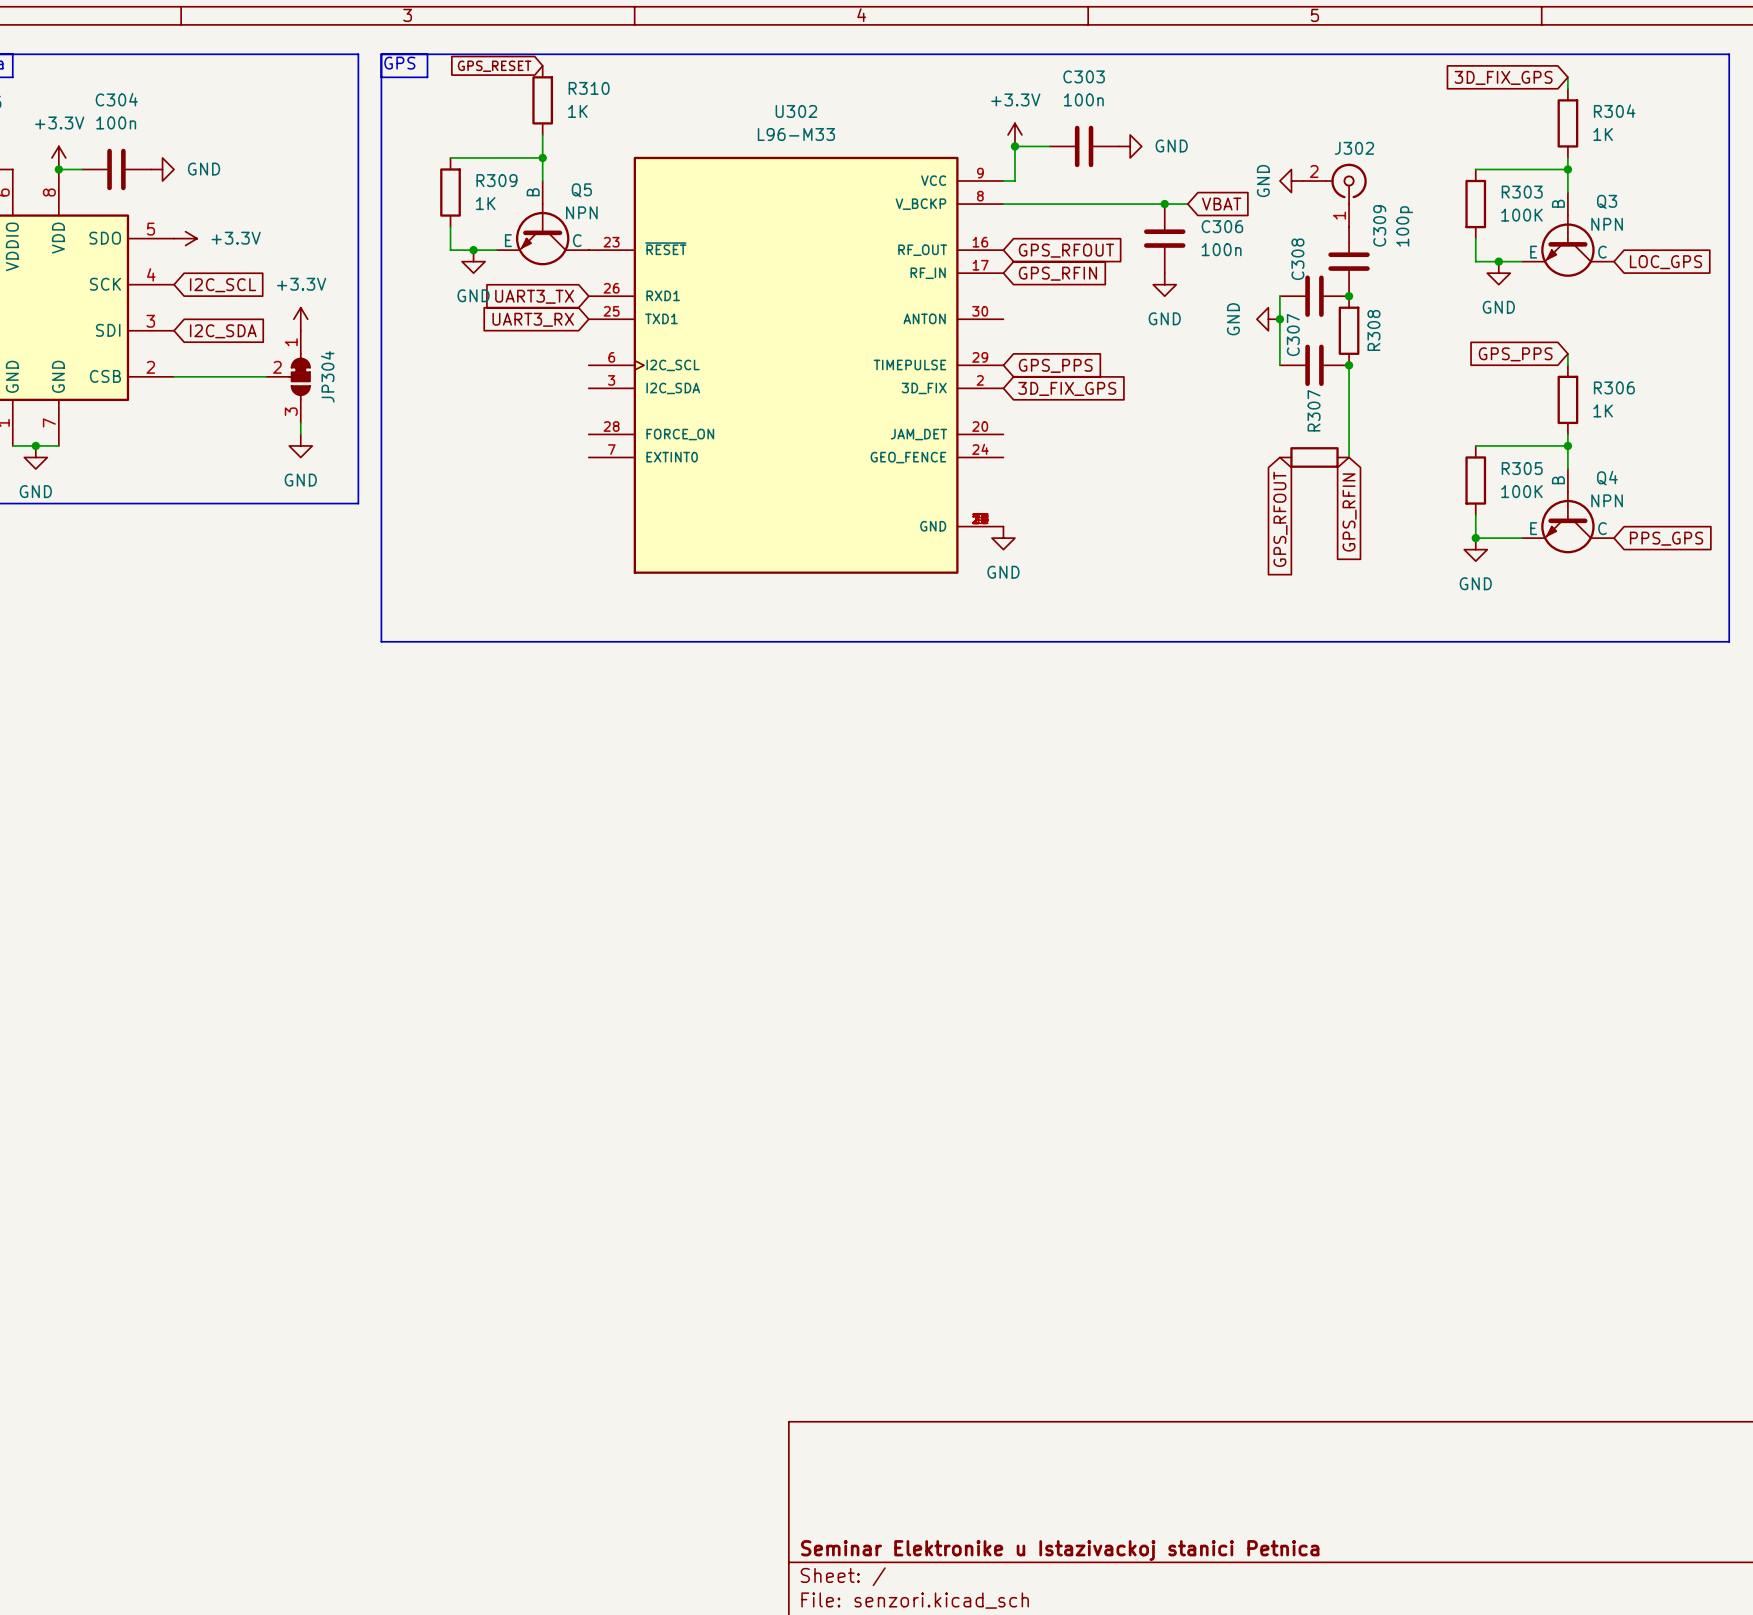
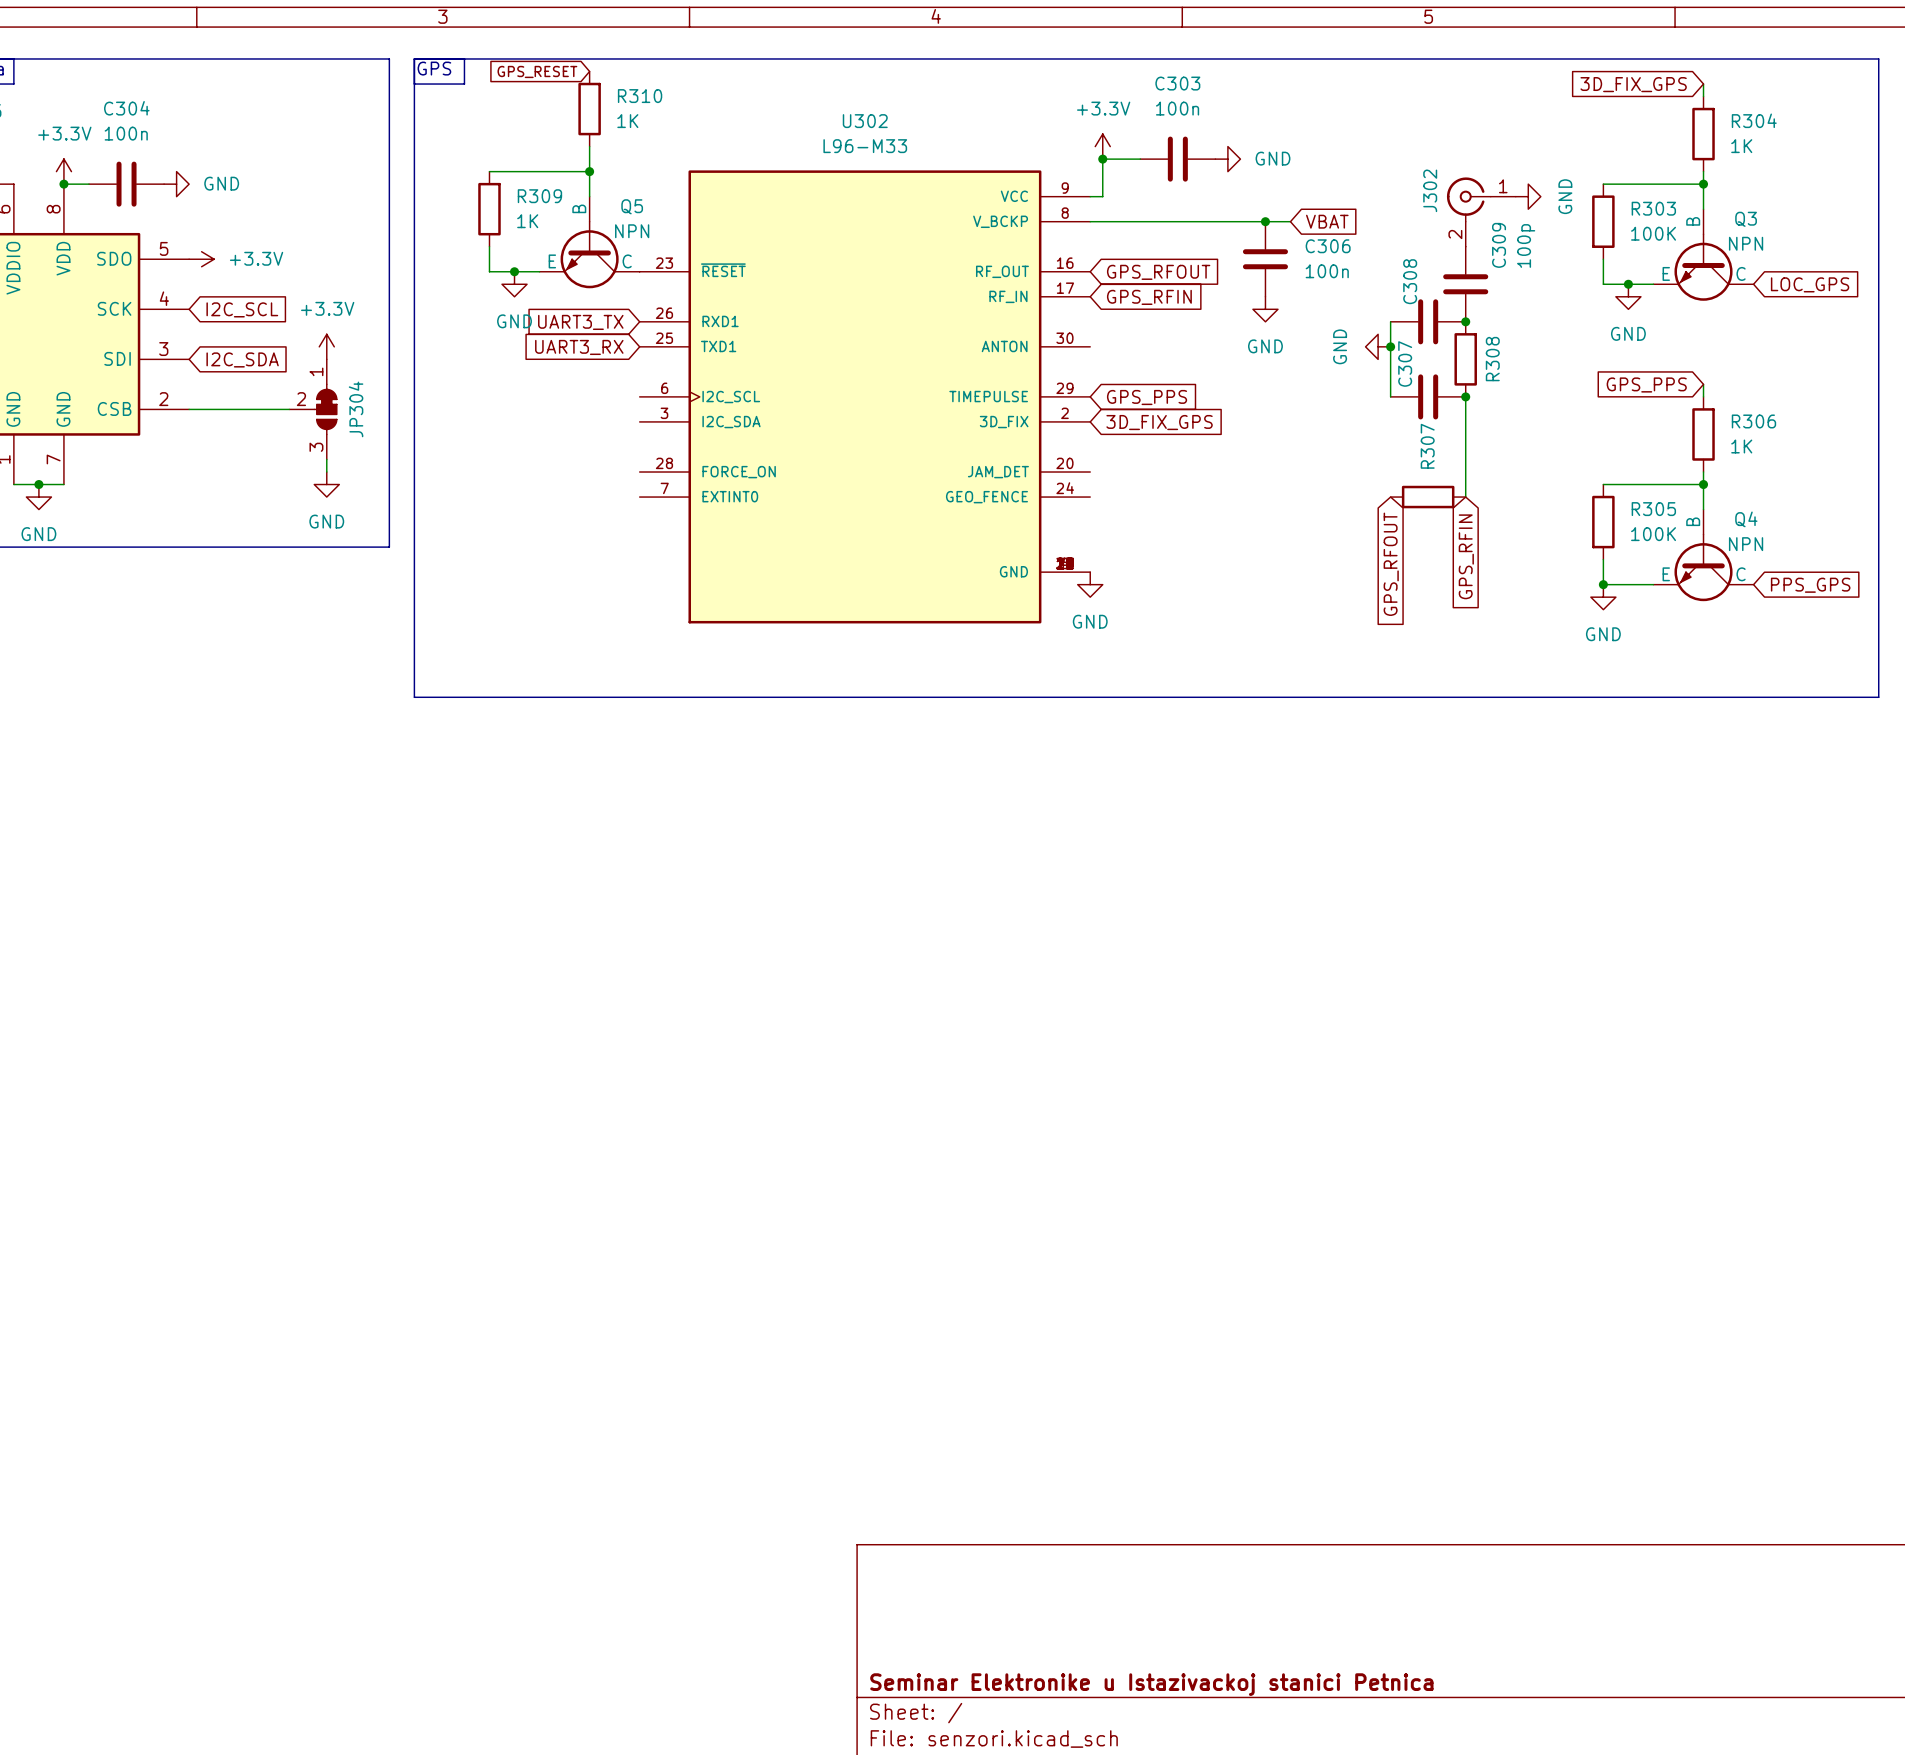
power symbol rotation: 0° (1291, 181) -> 180° (1528, 196)
power symbol position: GND (1291, 181) -> GND (1528, 196)
J302 rotation: 0° (1346, 183) -> 90° counterclockwise (1468, 199)

